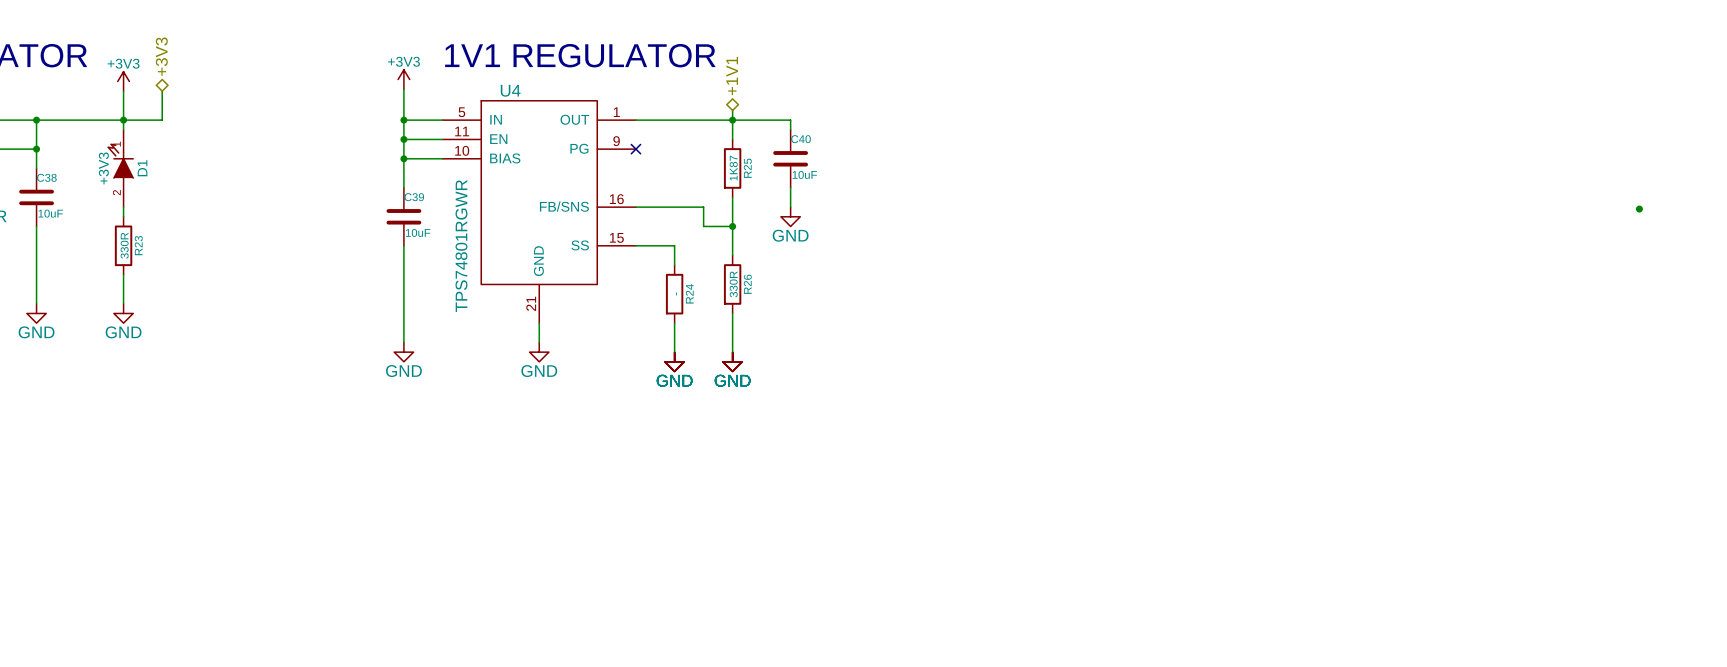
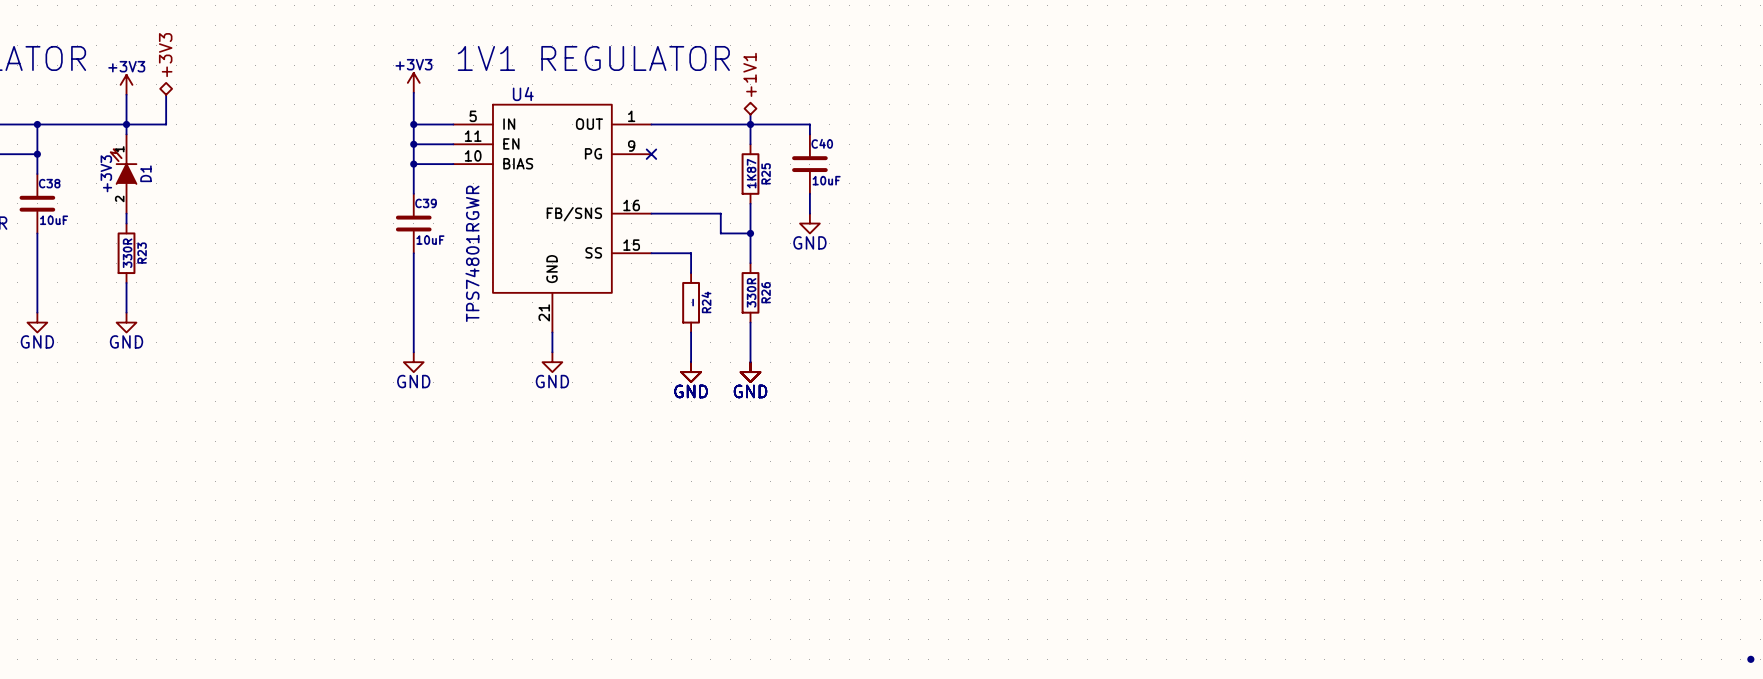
junction: (1639, 209) -> none
junction: none -> (1750, 659)

